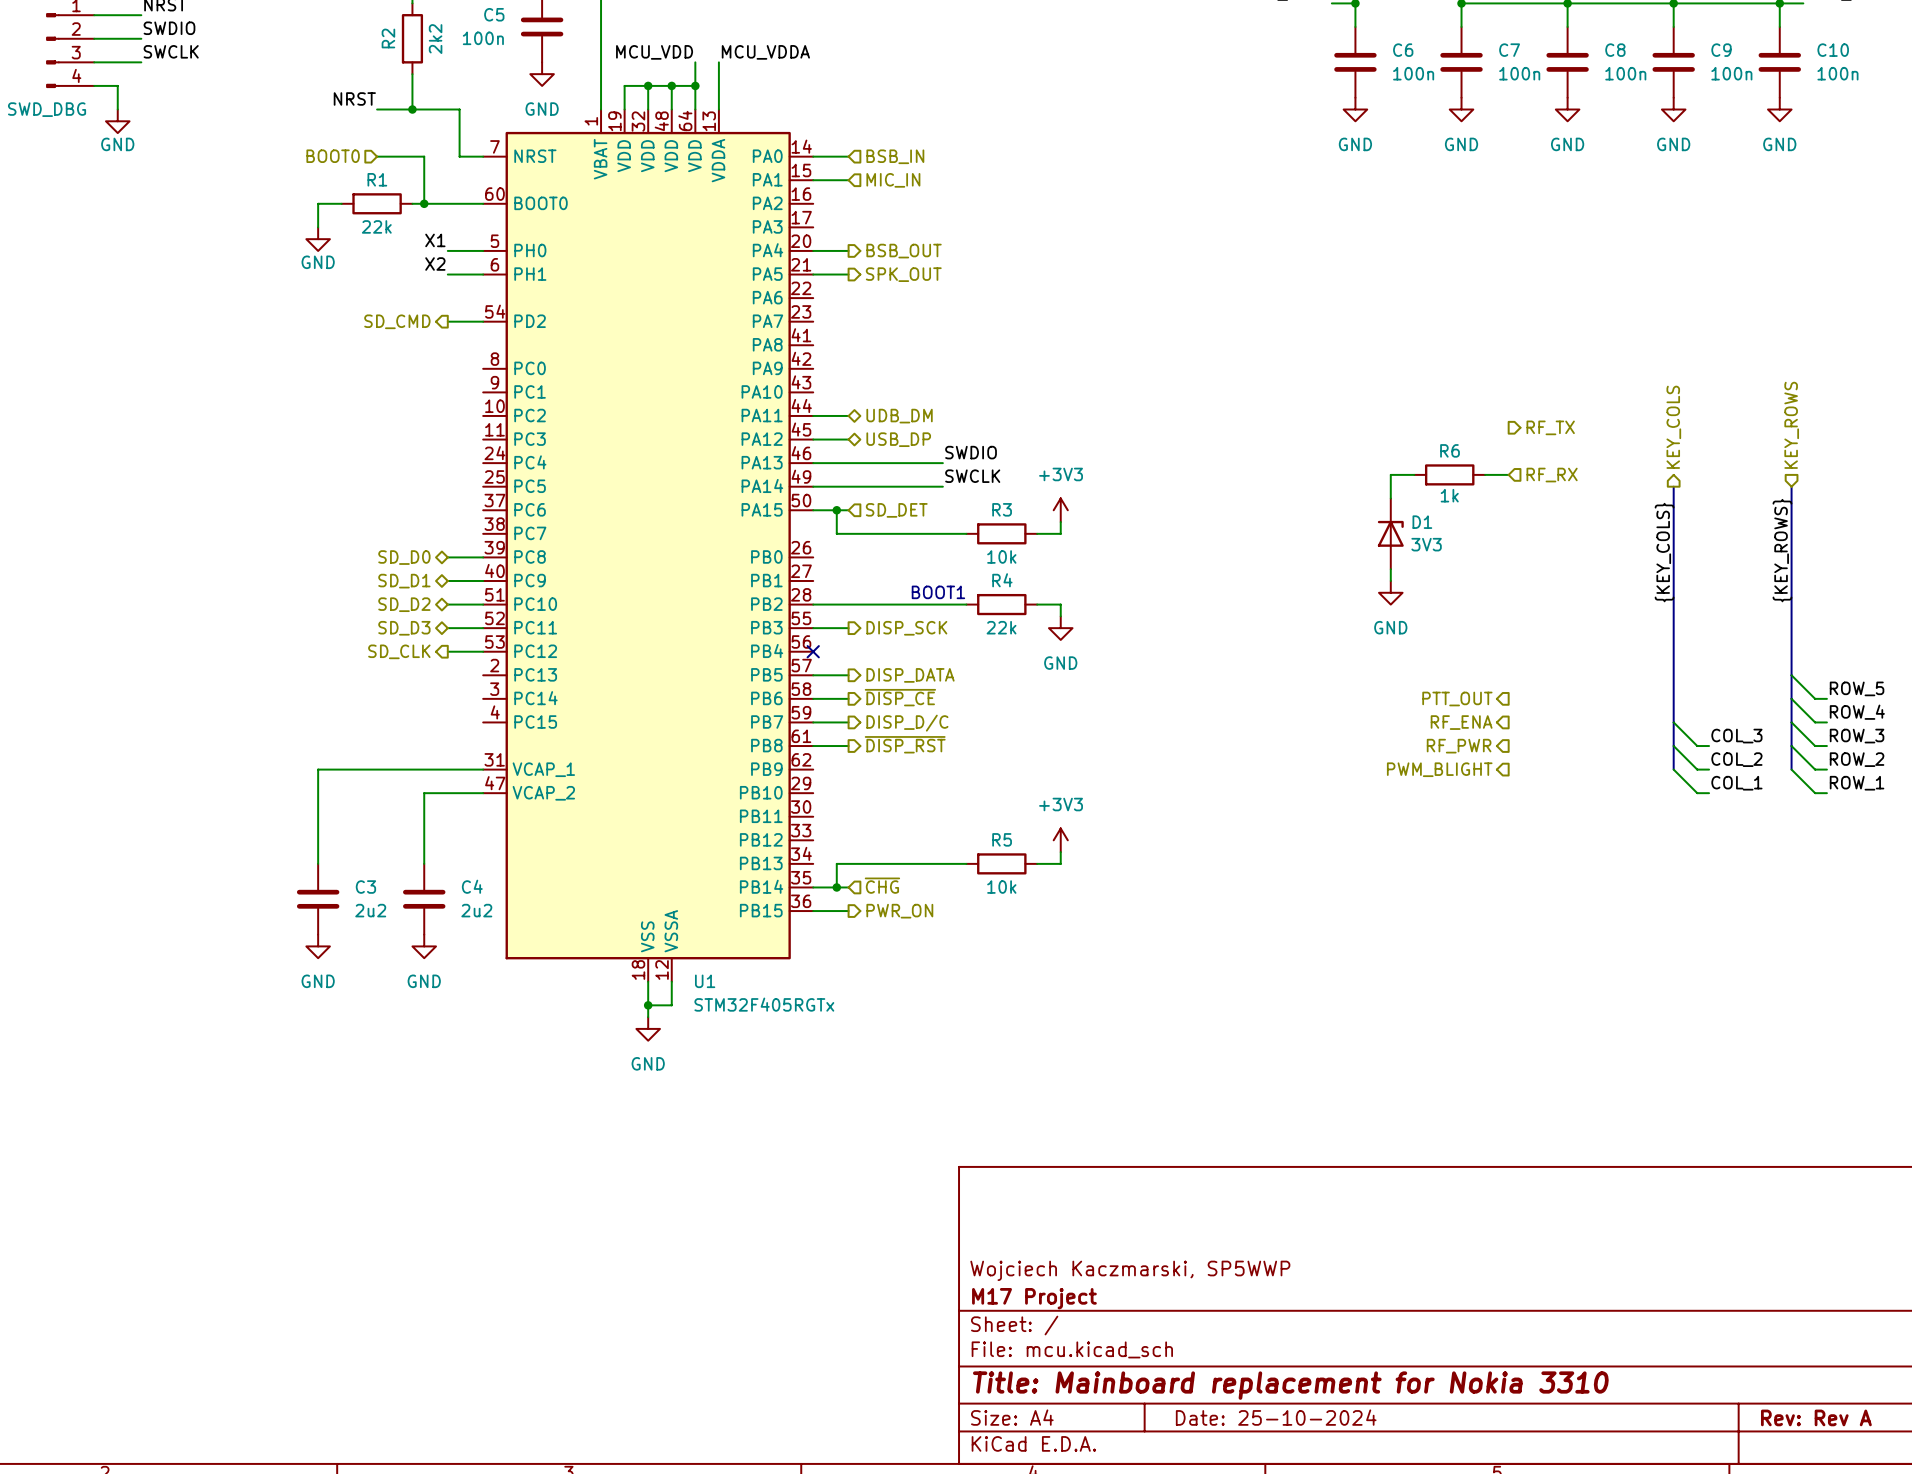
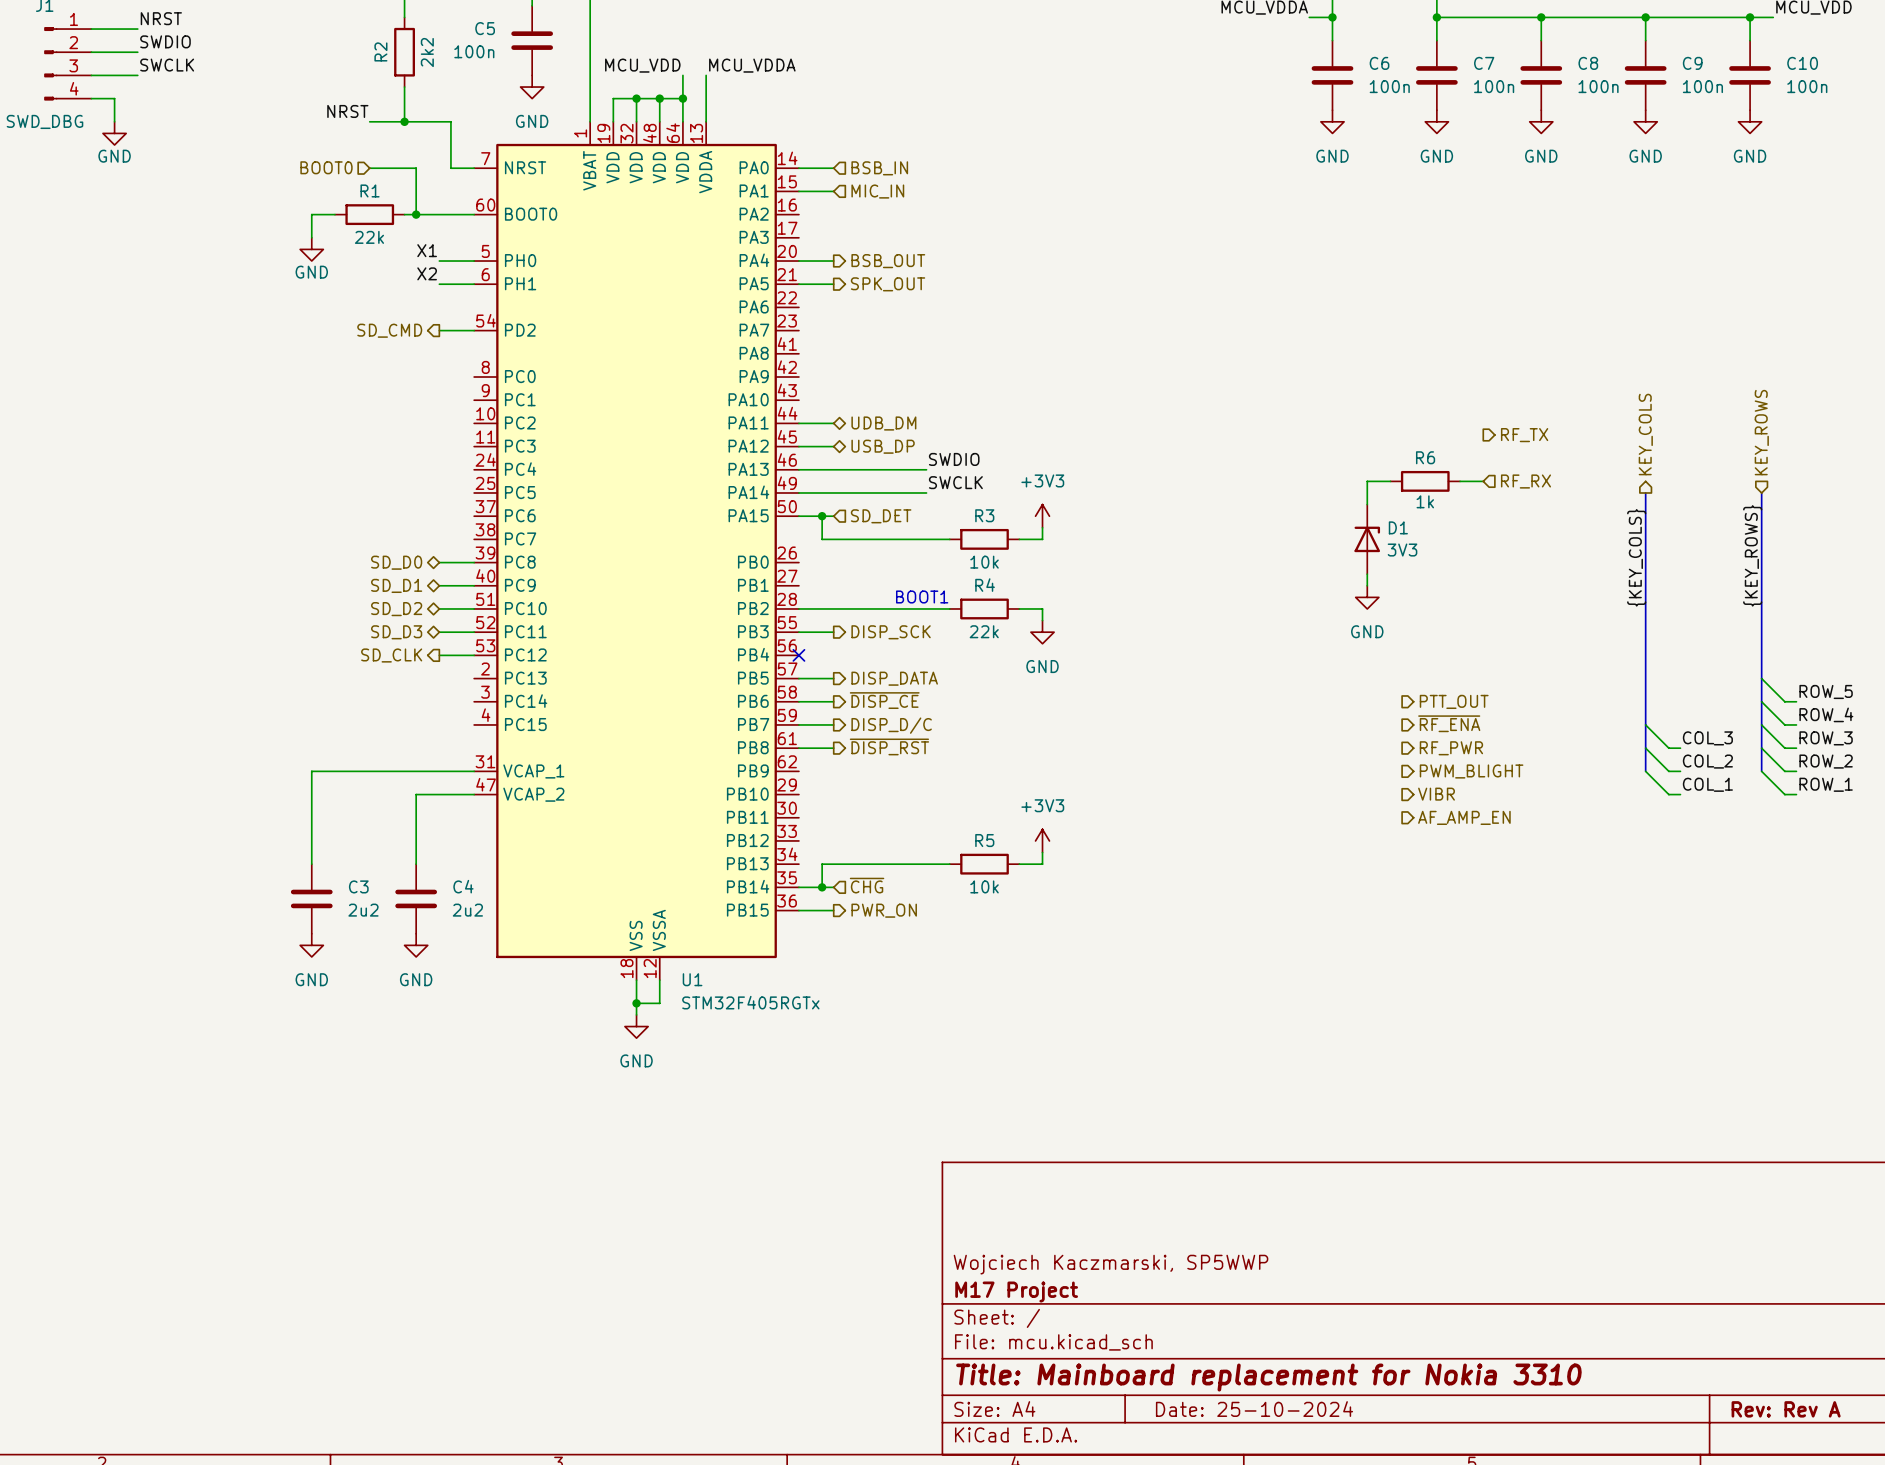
hierarchical label rotation: 0° (1457, 698) -> 180° (1454, 701)
hierarchical label: RF_ENA (1461, 722) -> ~{RF_ENA} (1449, 723)
hierarchical label rotation: 0° (1459, 746) -> 180° (1451, 748)
hierarchical label rotation: 0° (1439, 769) -> 180° (1471, 771)
hierarchical label: none -> VIBR (1436, 794)
hierarchical label: none -> AF_AMP_EN (1464, 817)

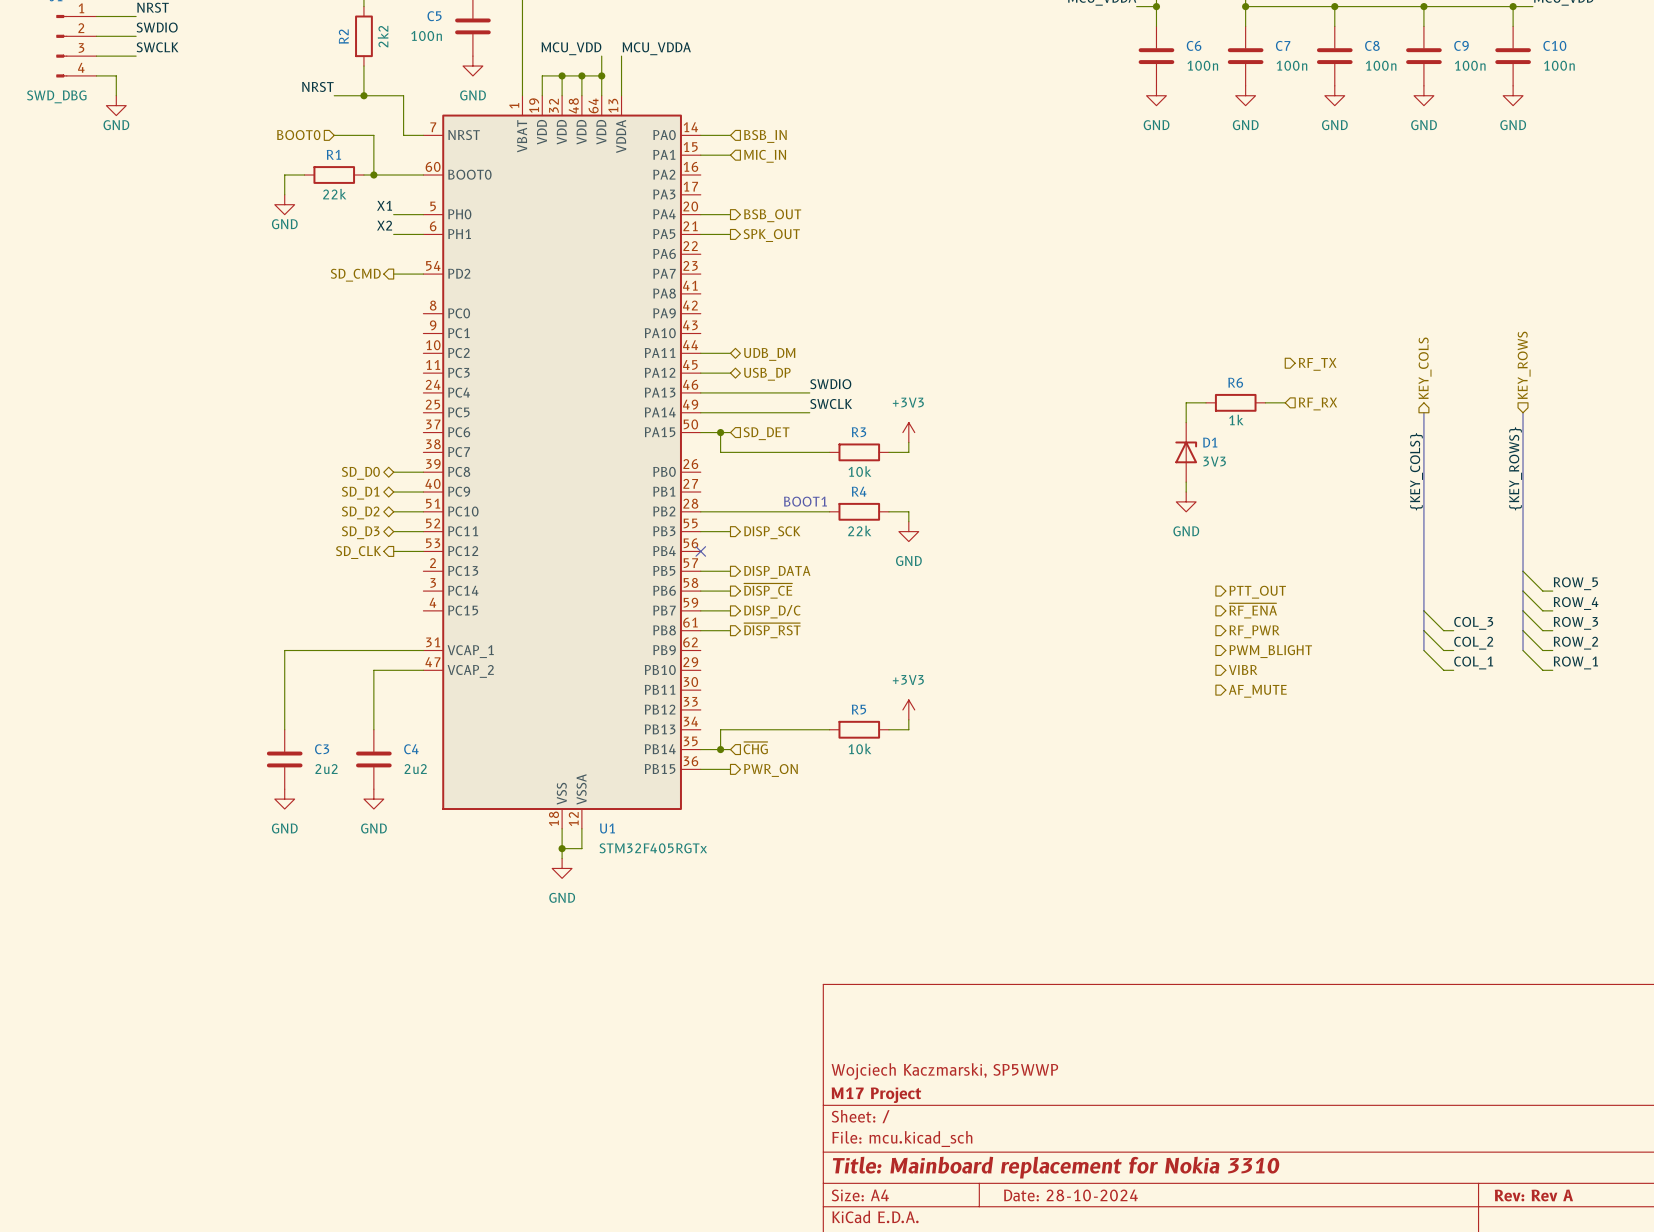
hierarchical label: AF_AMP_EN (1464, 817) -> AF_MUTE (1257, 691)
title block: Date: 25-10-2024 (1254, 1409) -> Date: 28-10-2024 (1070, 1195)

